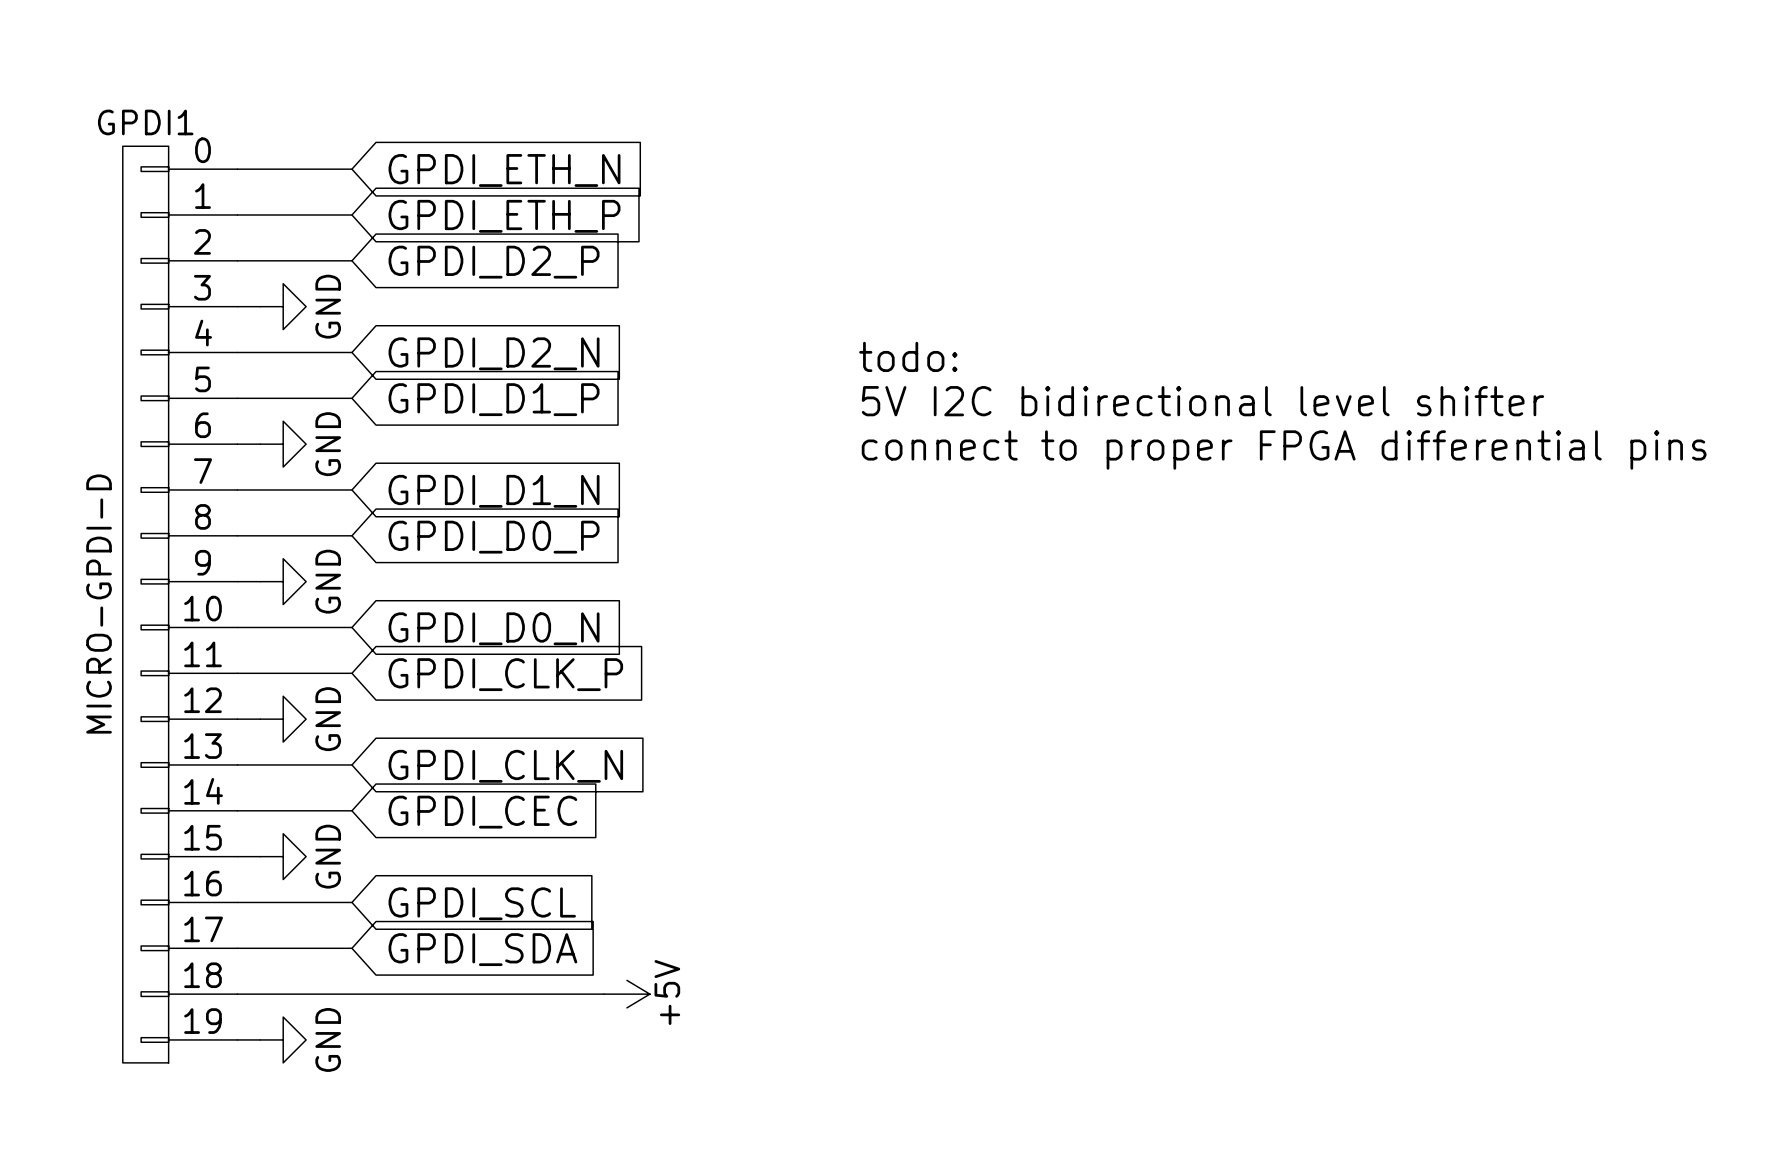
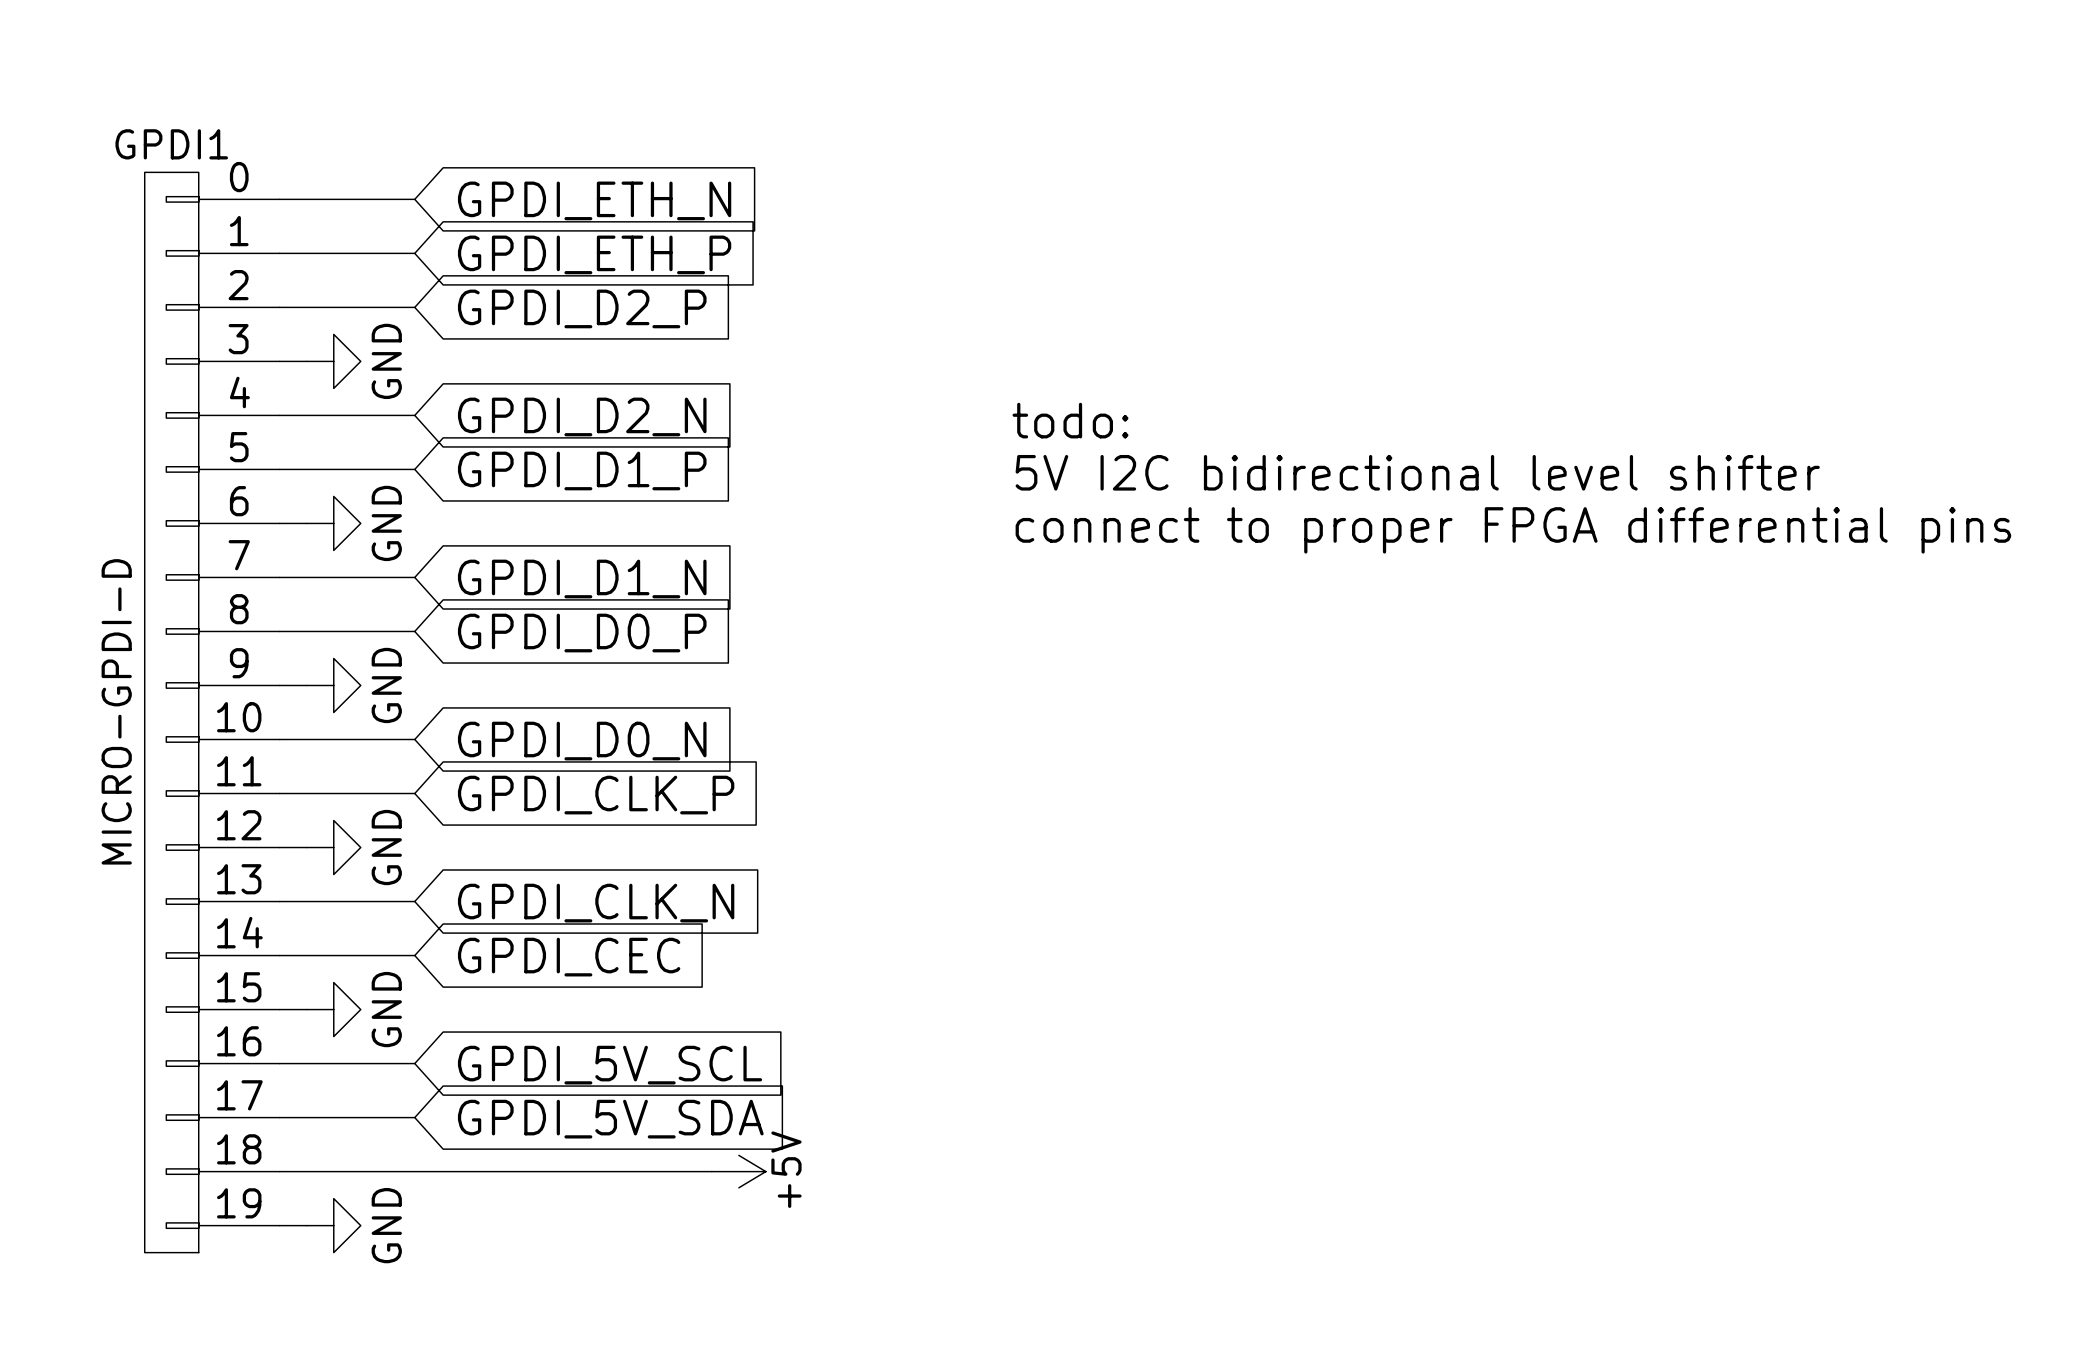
global label: GPDI_SCL (482, 903) -> GPDI_5V_SCL (610, 1065)
global label: GPDI_SDA (482, 949) -> GPDI_5V_SDA (610, 1119)

